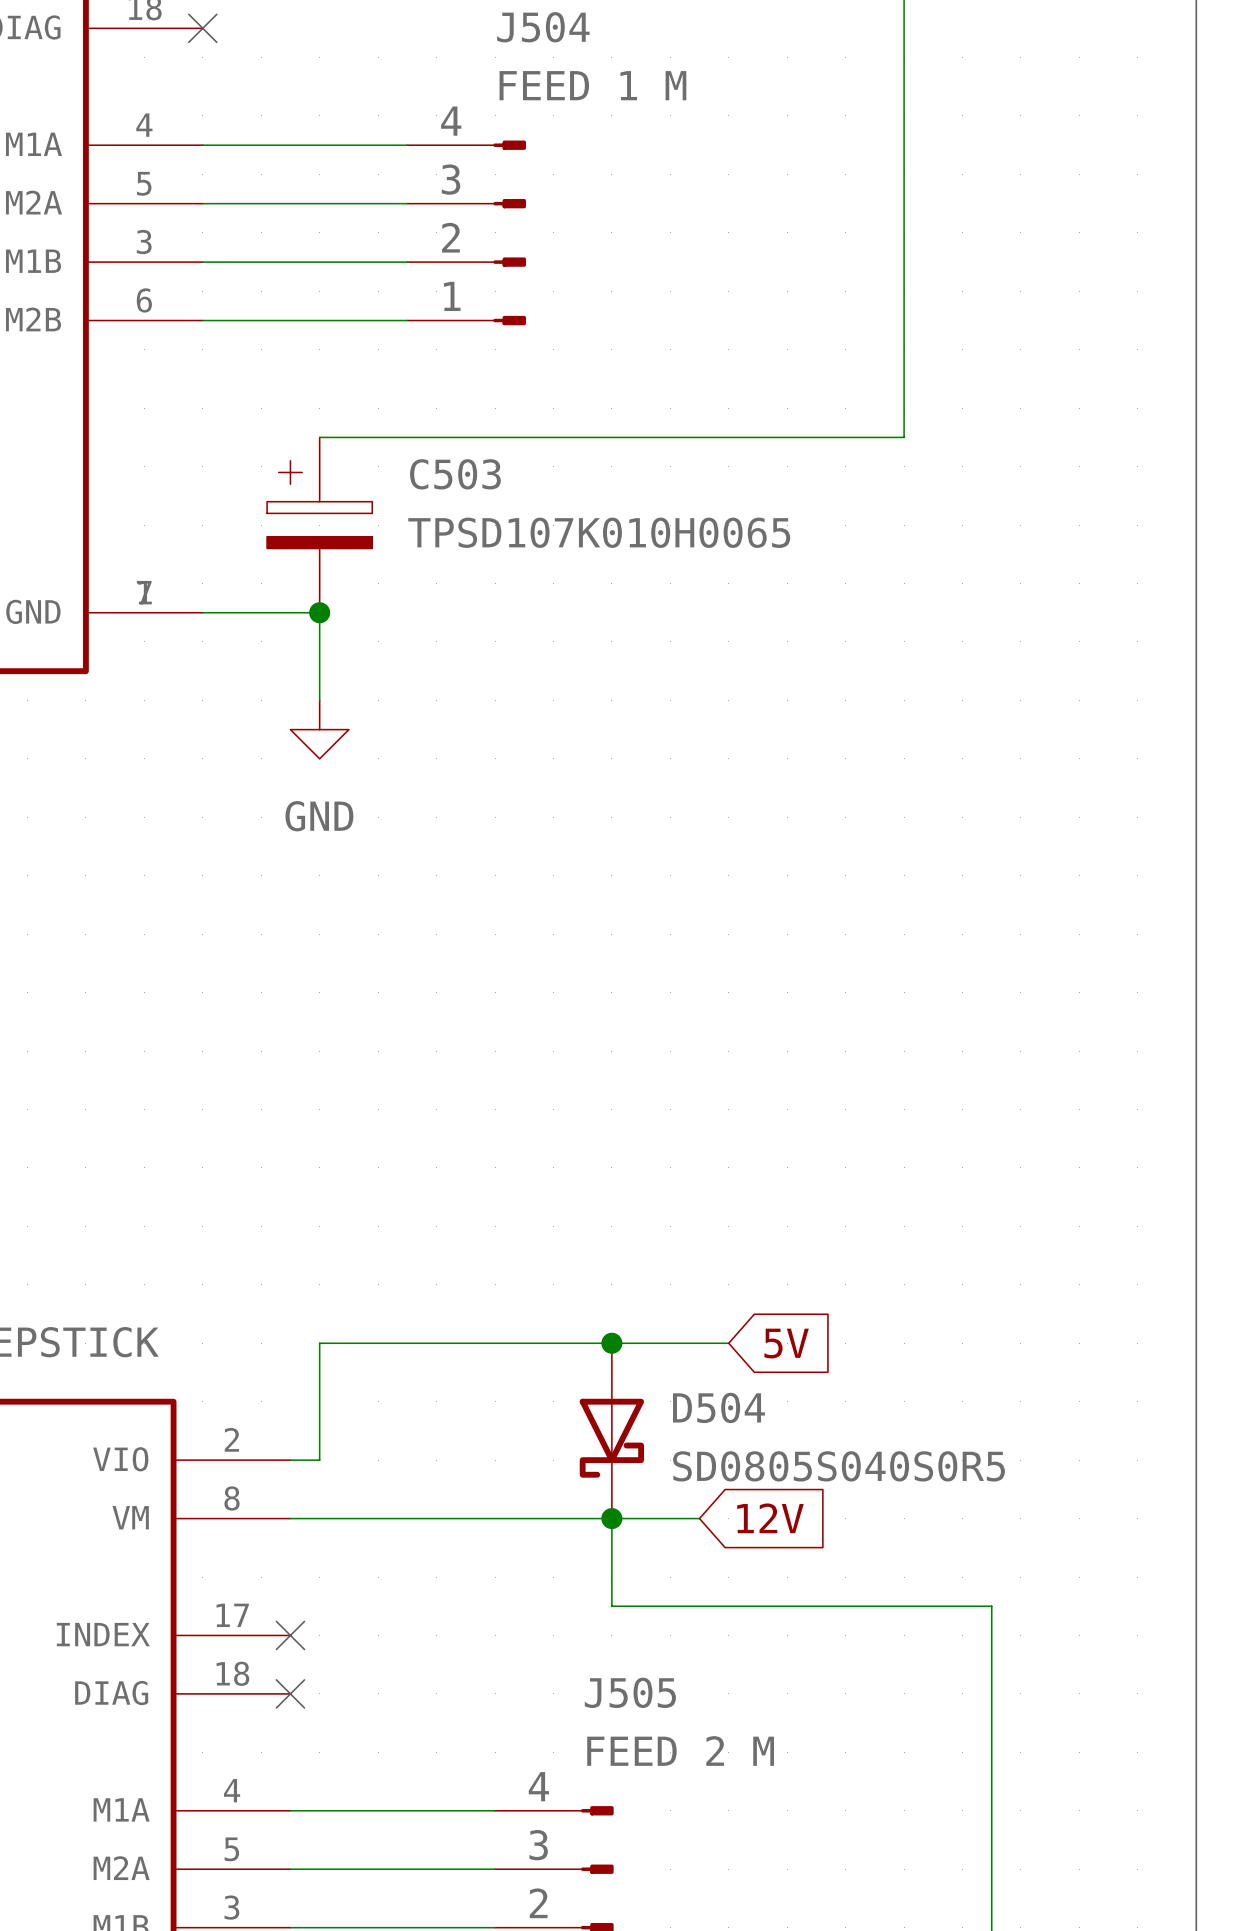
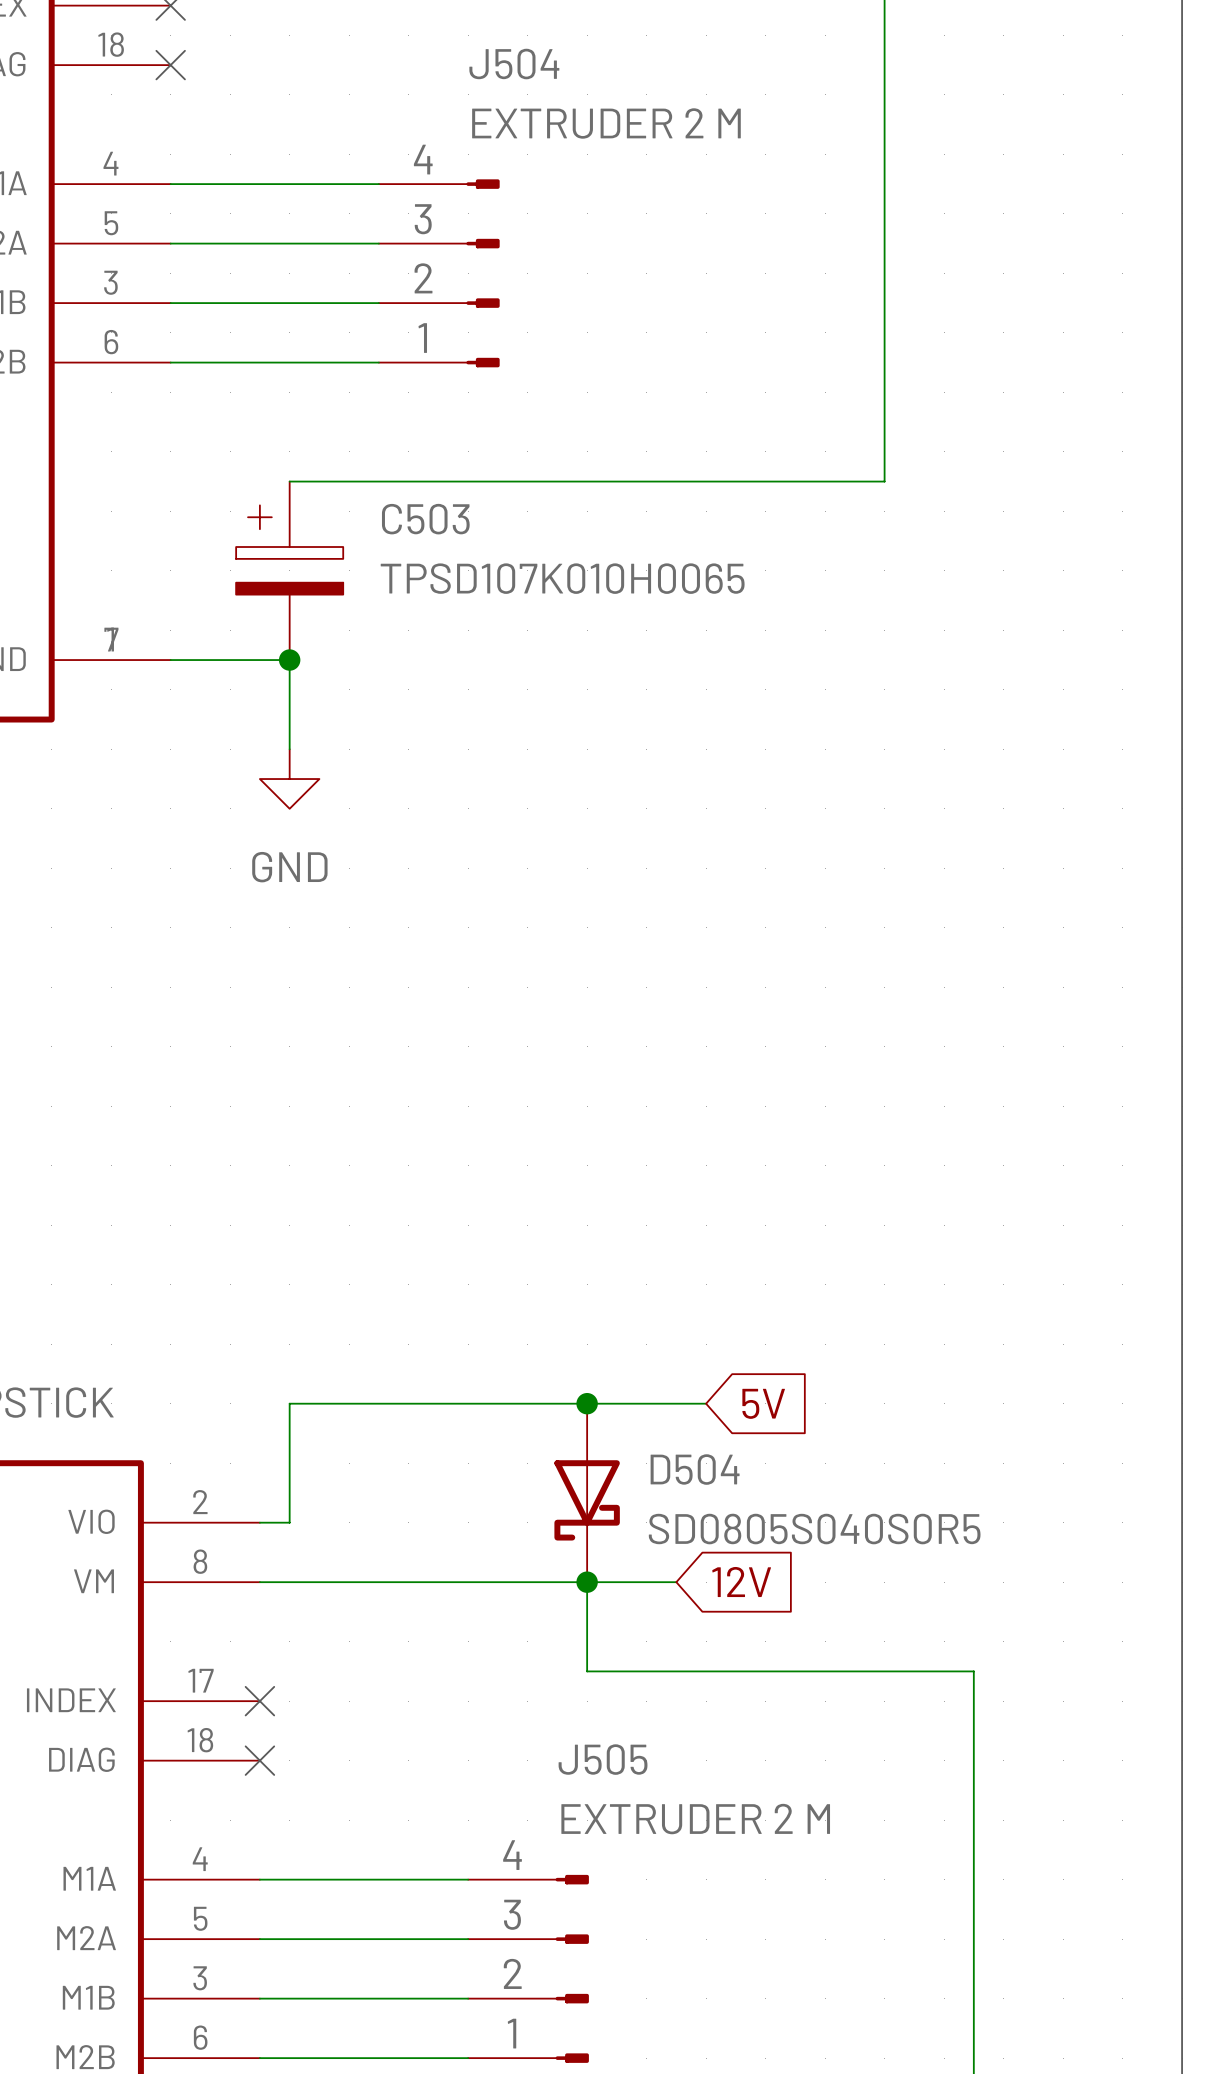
J504 value: FEED 1 M (592, 85) -> EXTRUDER 2 M (606, 123)
J505 value: FEED 2 M (680, 1750) -> EXTRUDER 2 M (695, 1819)

